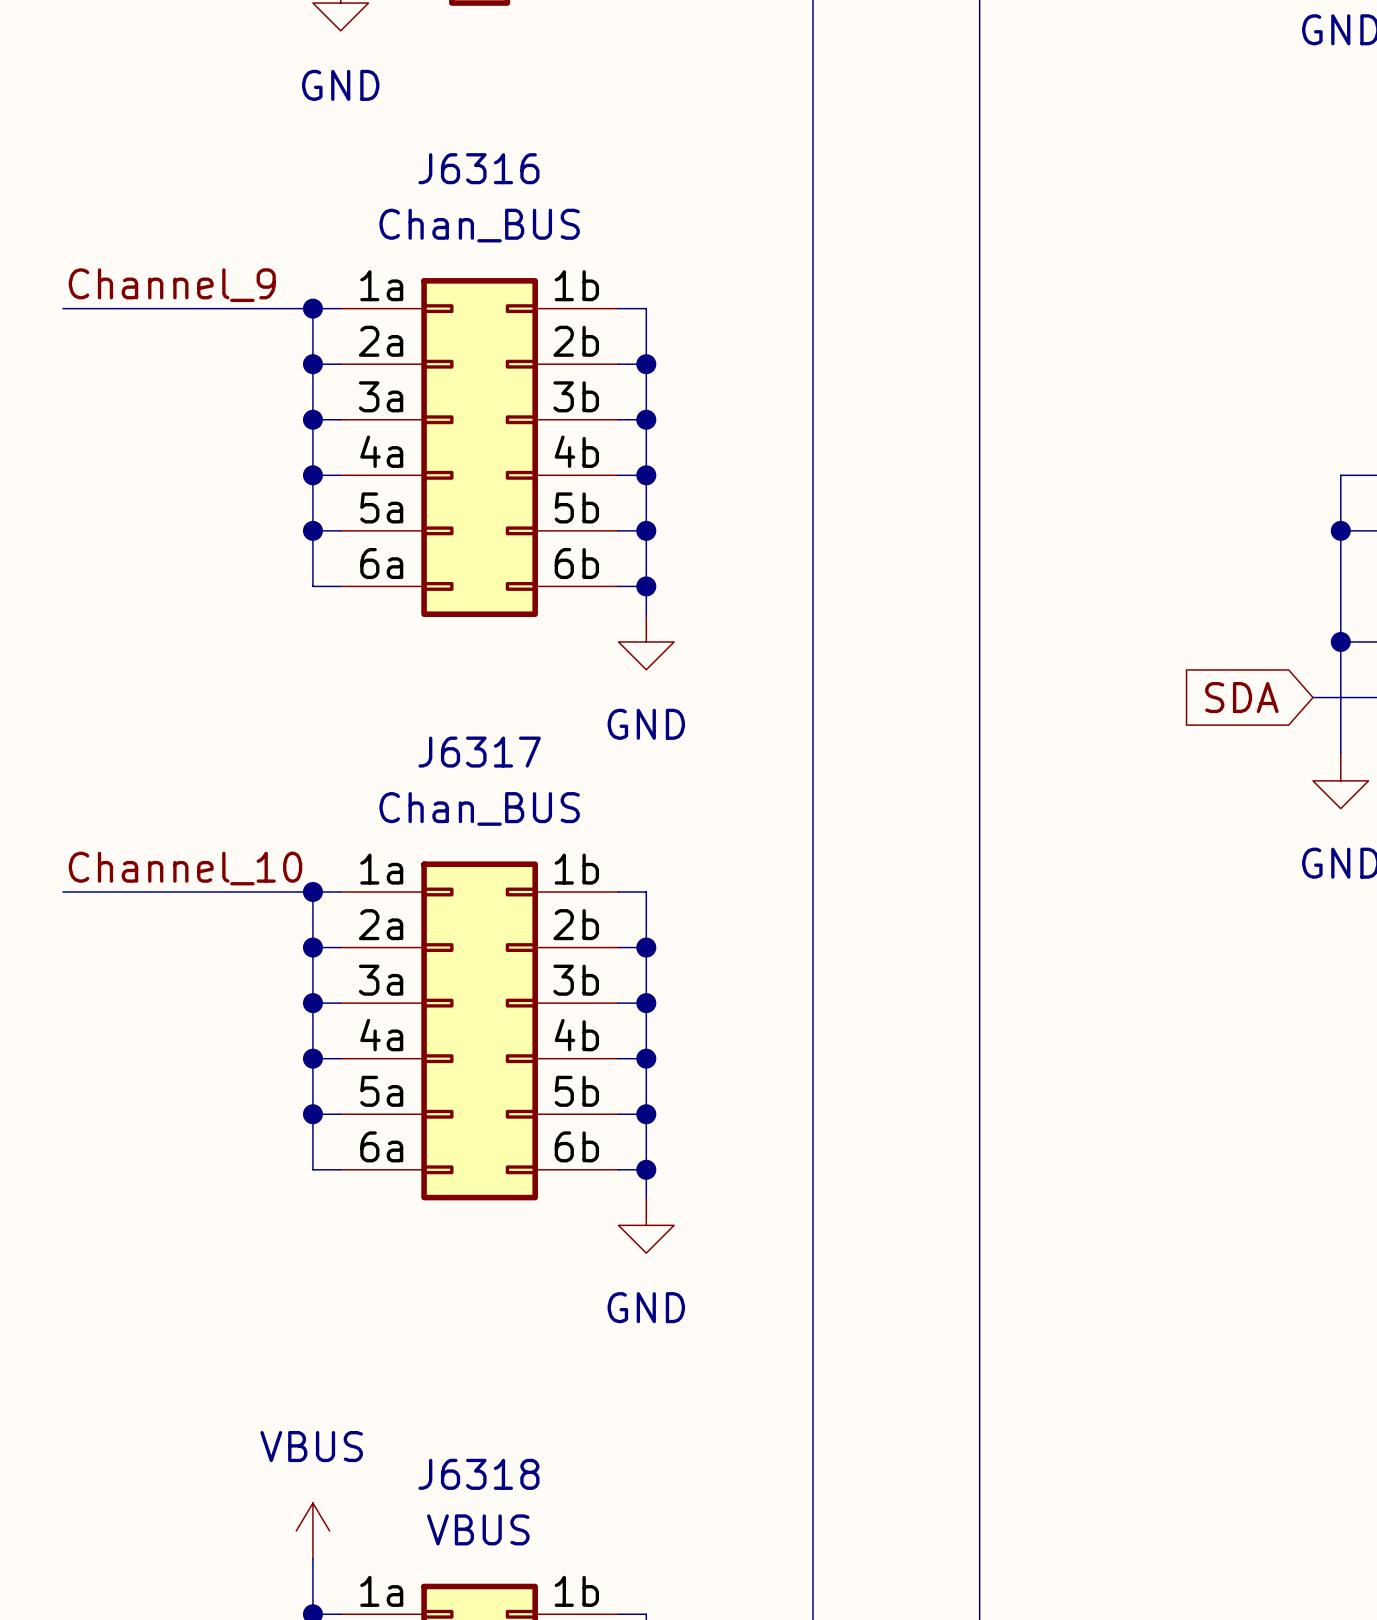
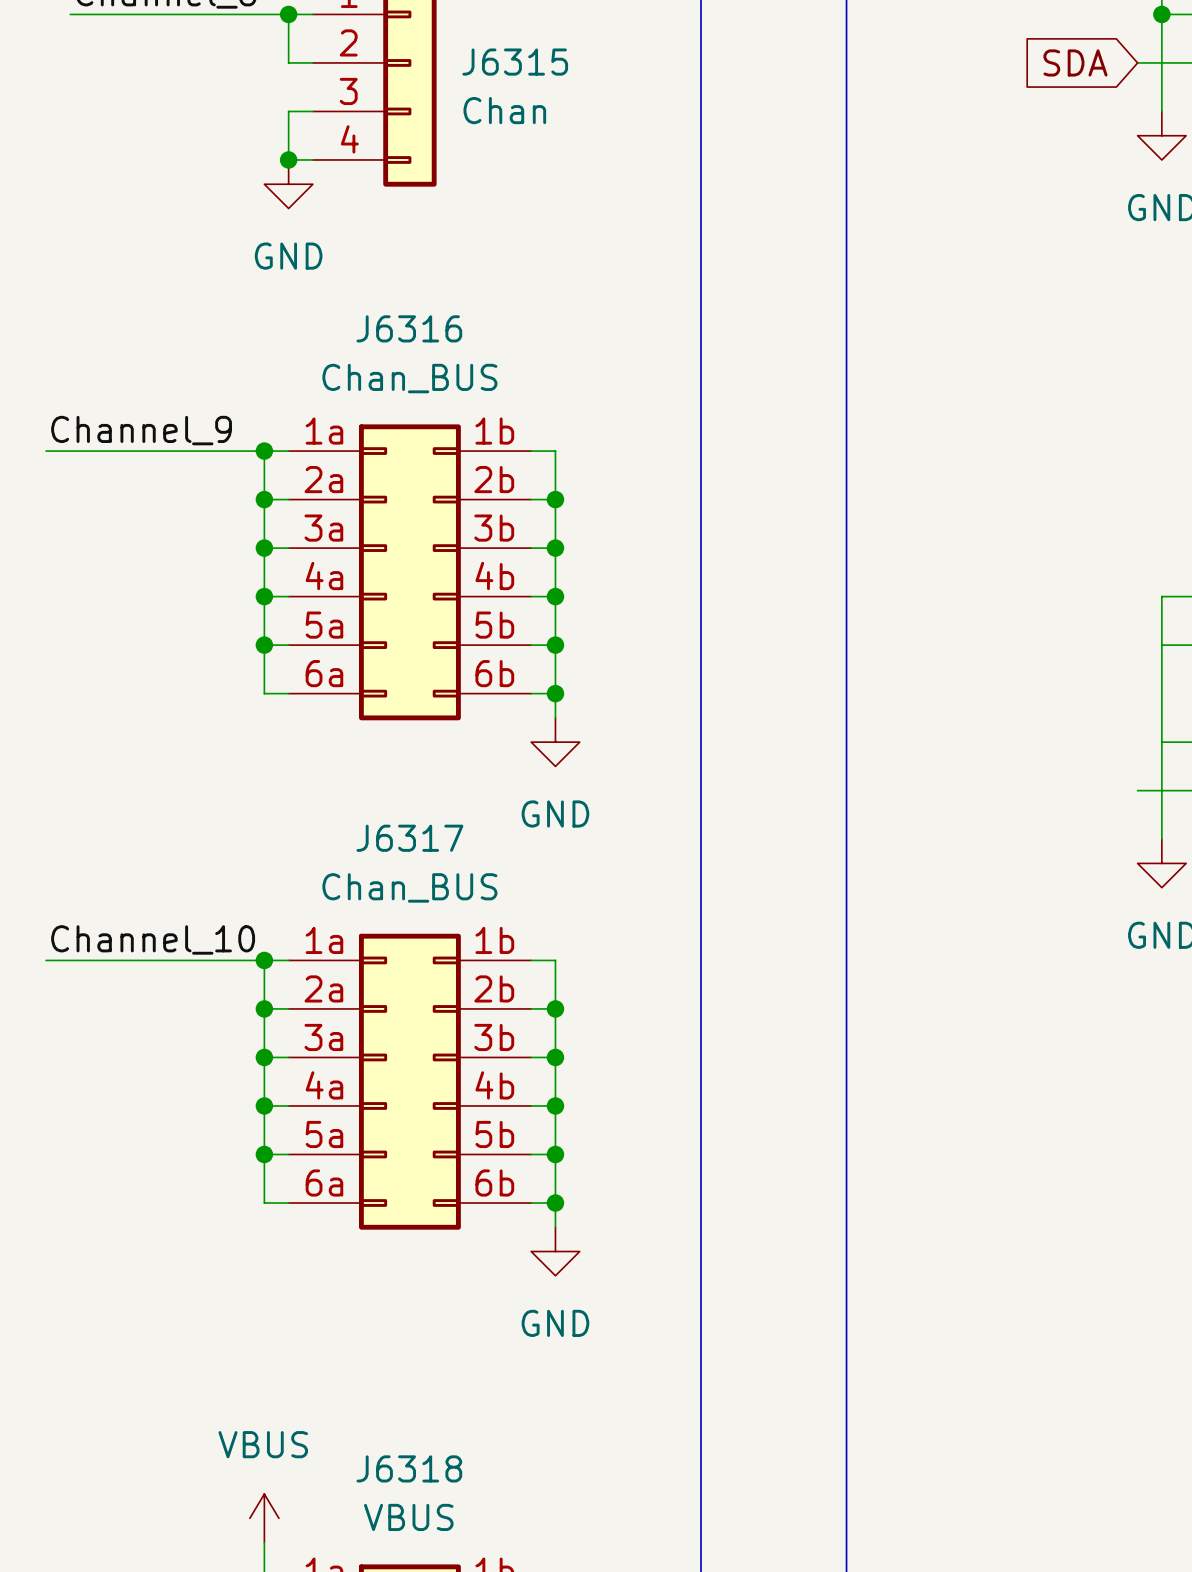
junction: (1340, 530) -> none
junction: (1340, 641) -> none
global label: SDA (1241, 697) -> none

